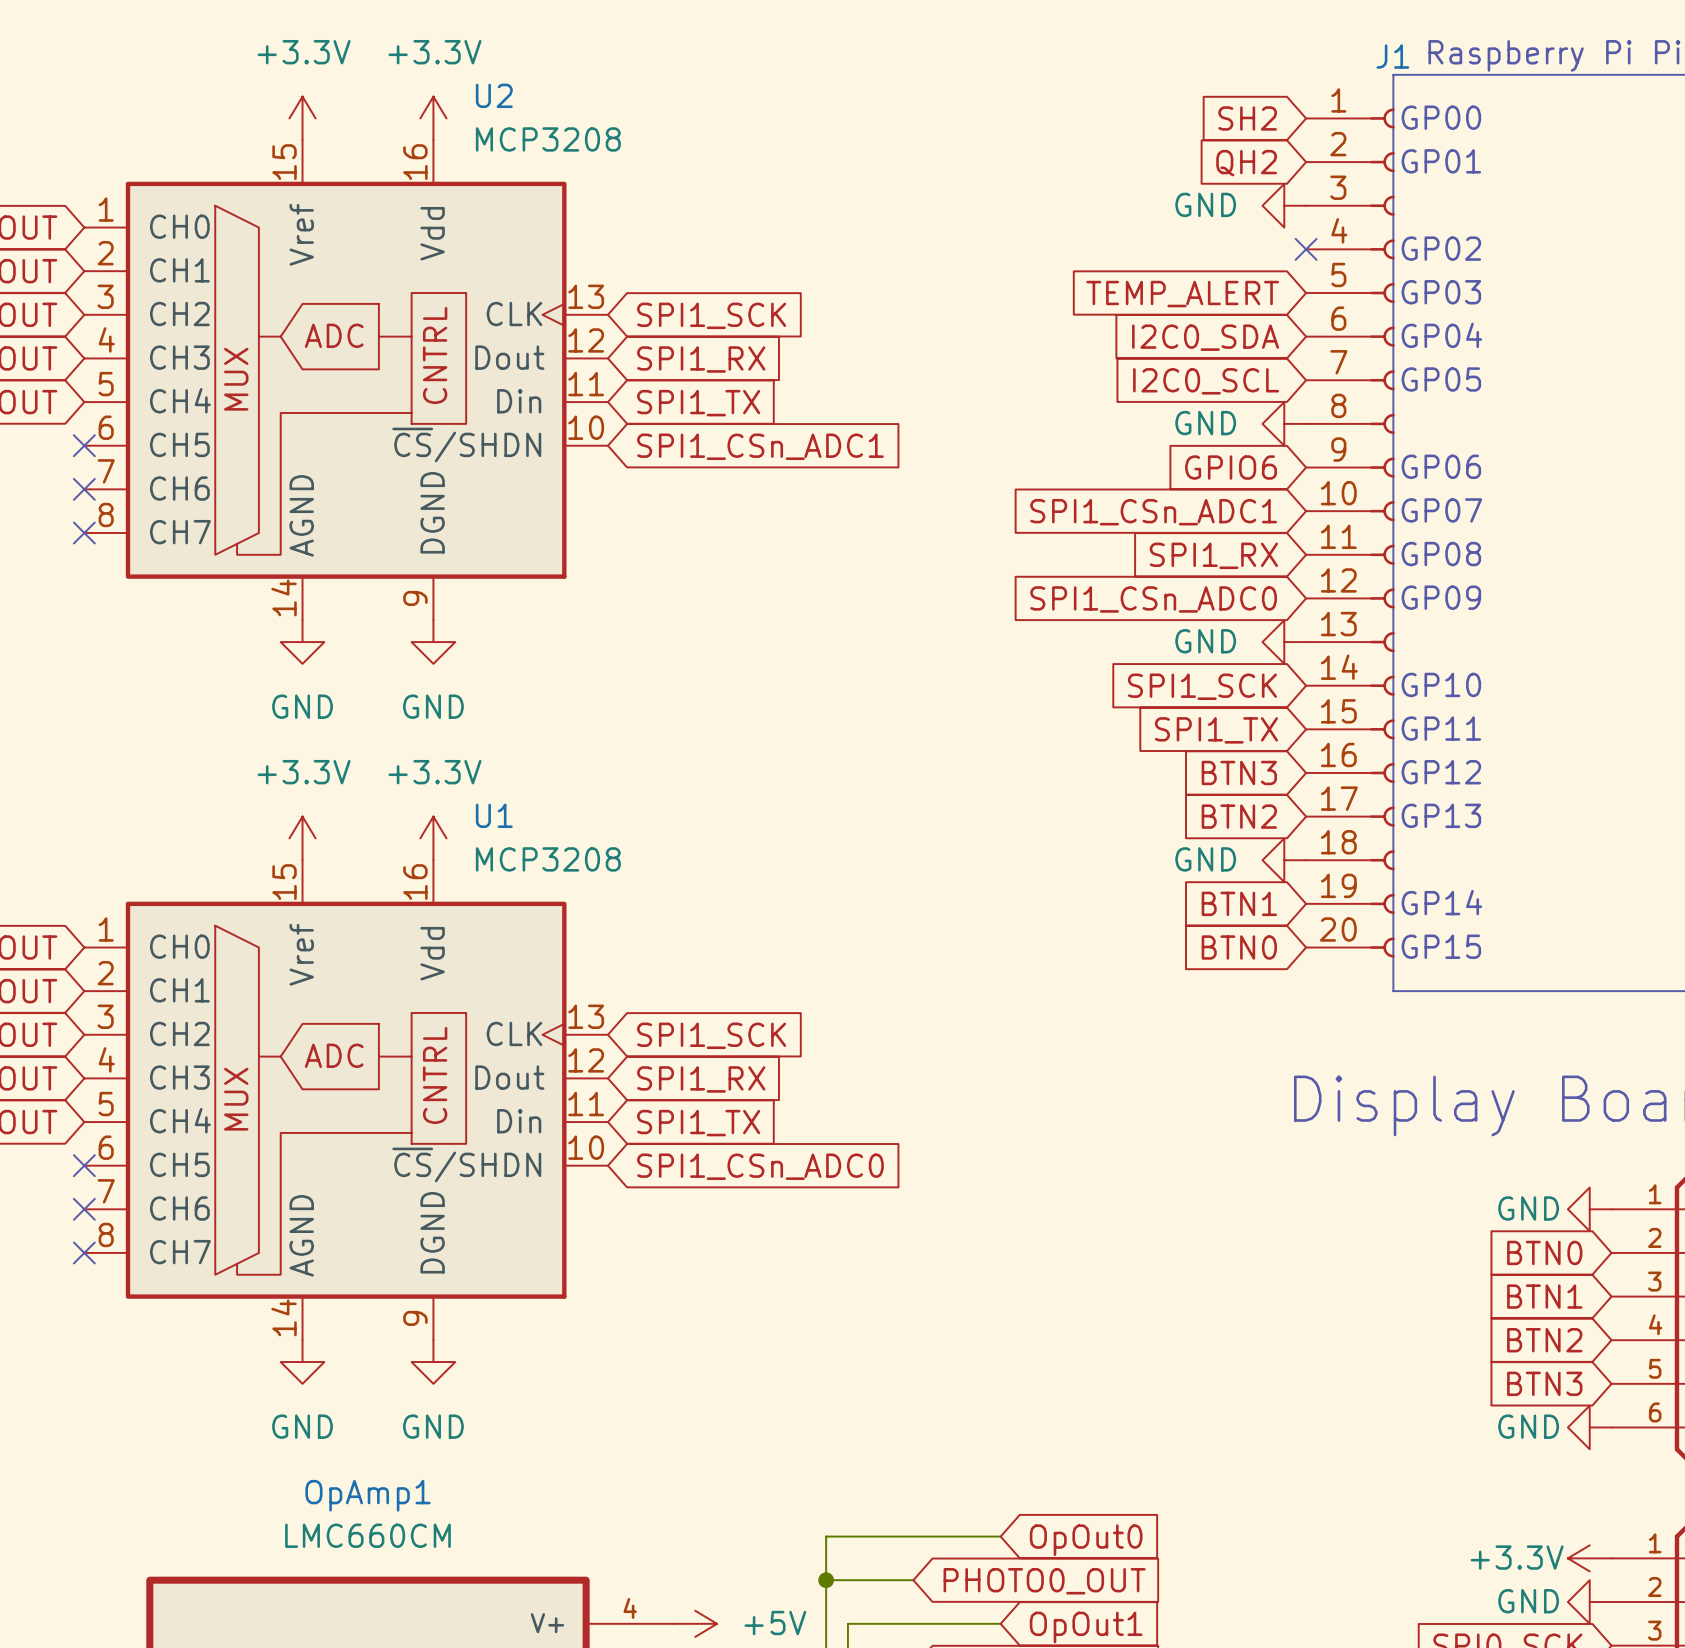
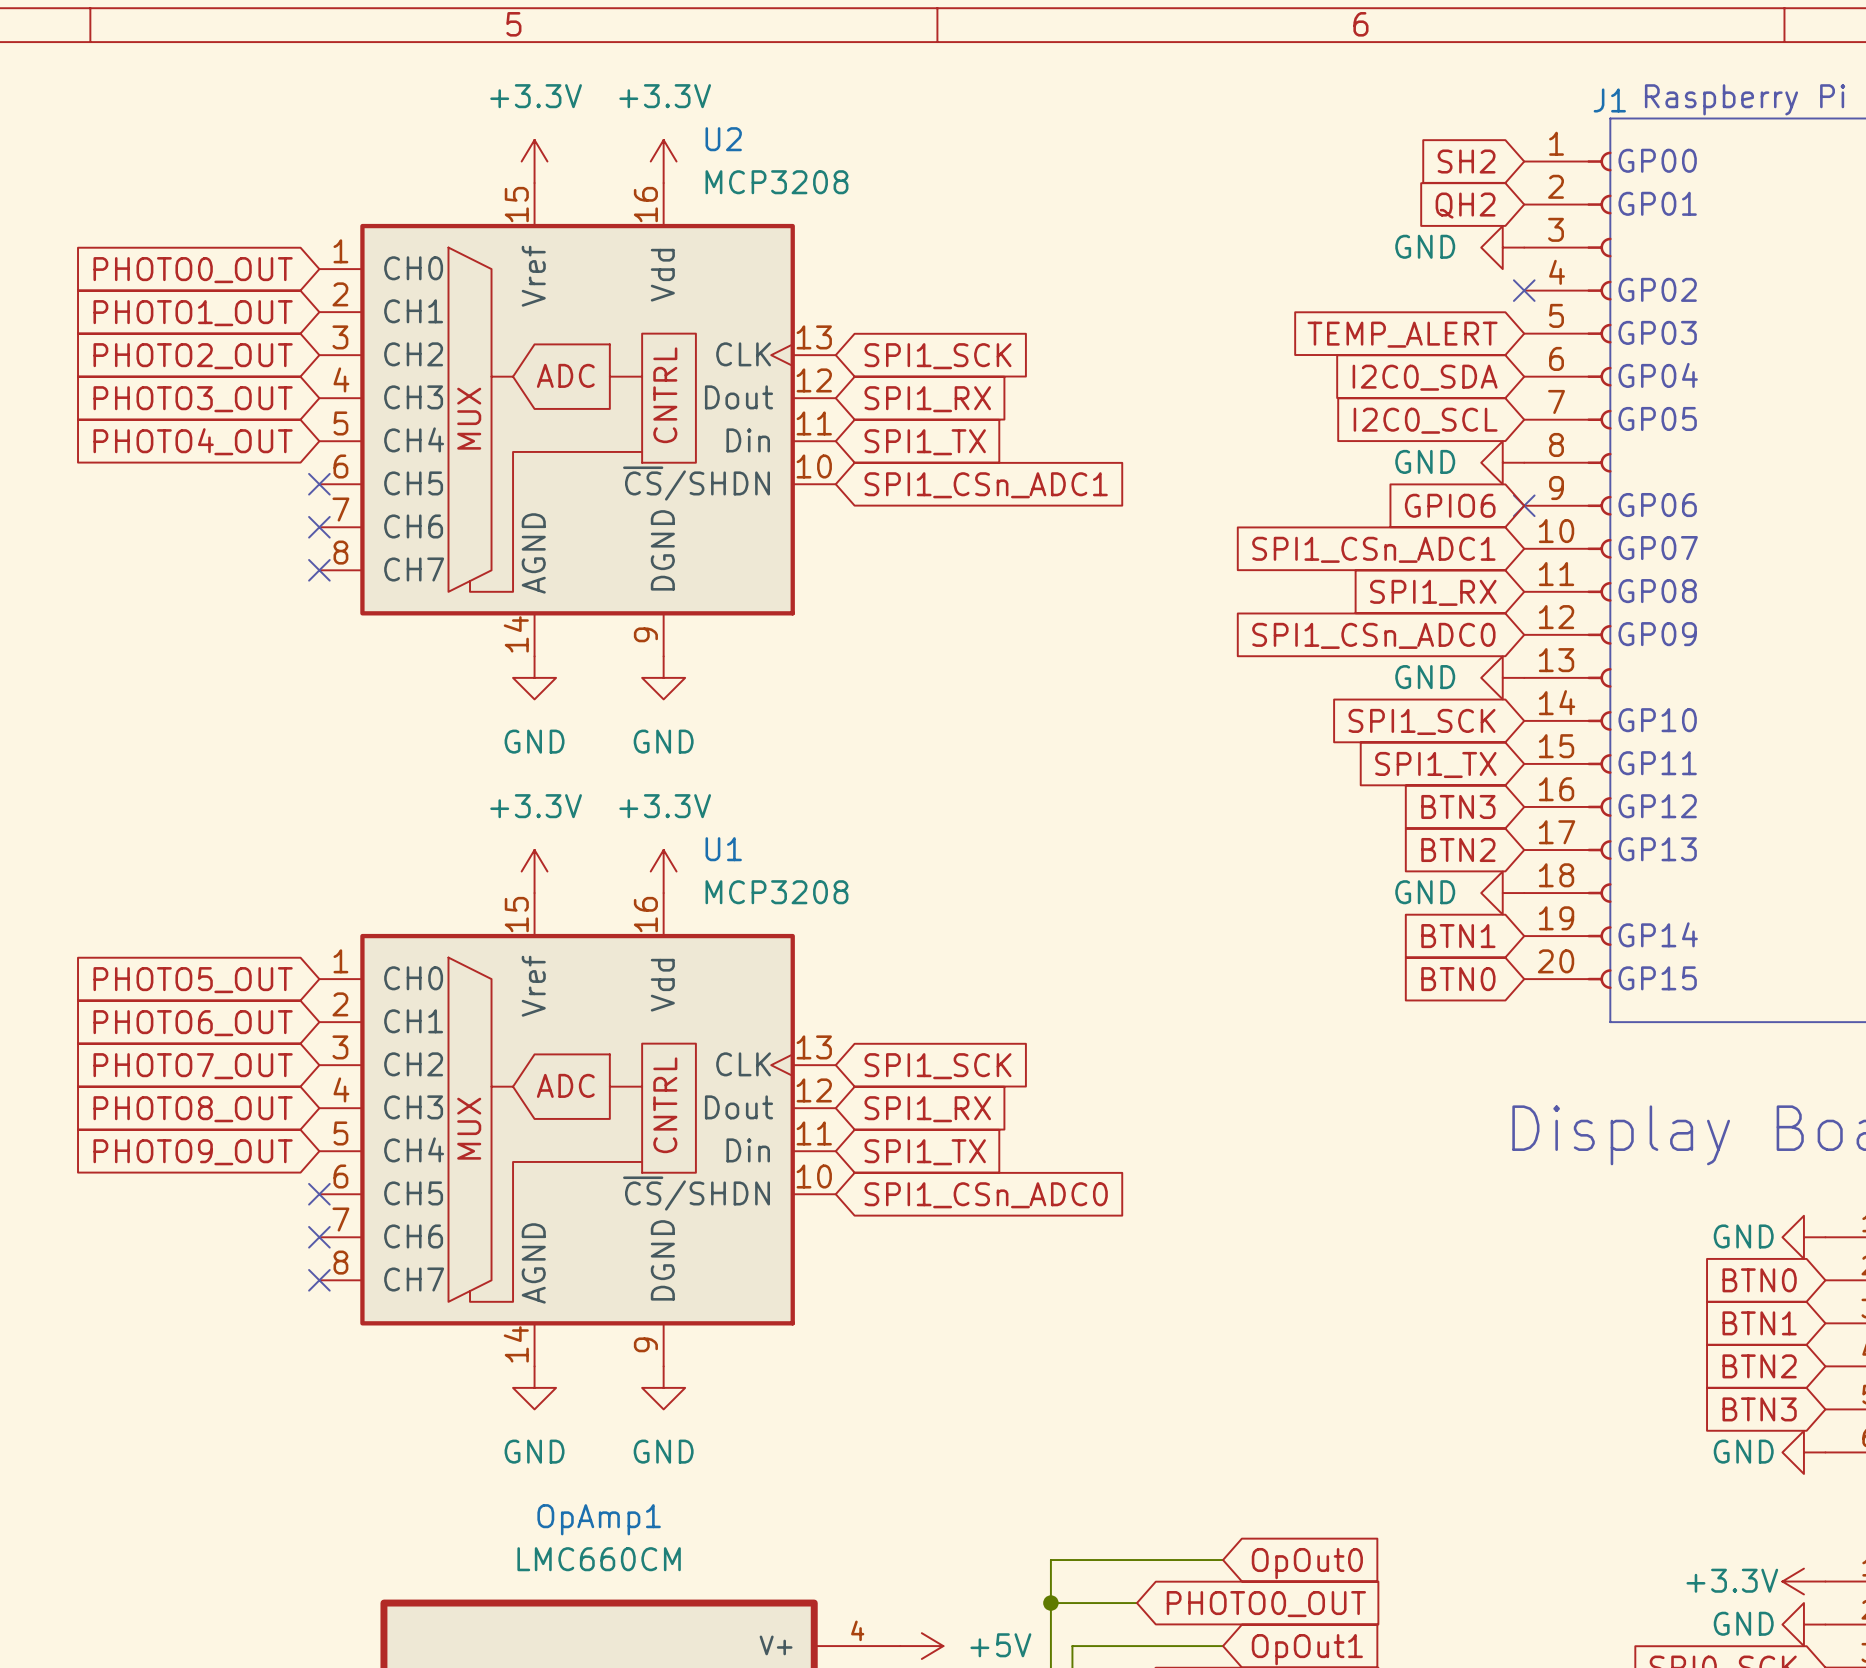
no-connect mark: none -> (1524, 505)

